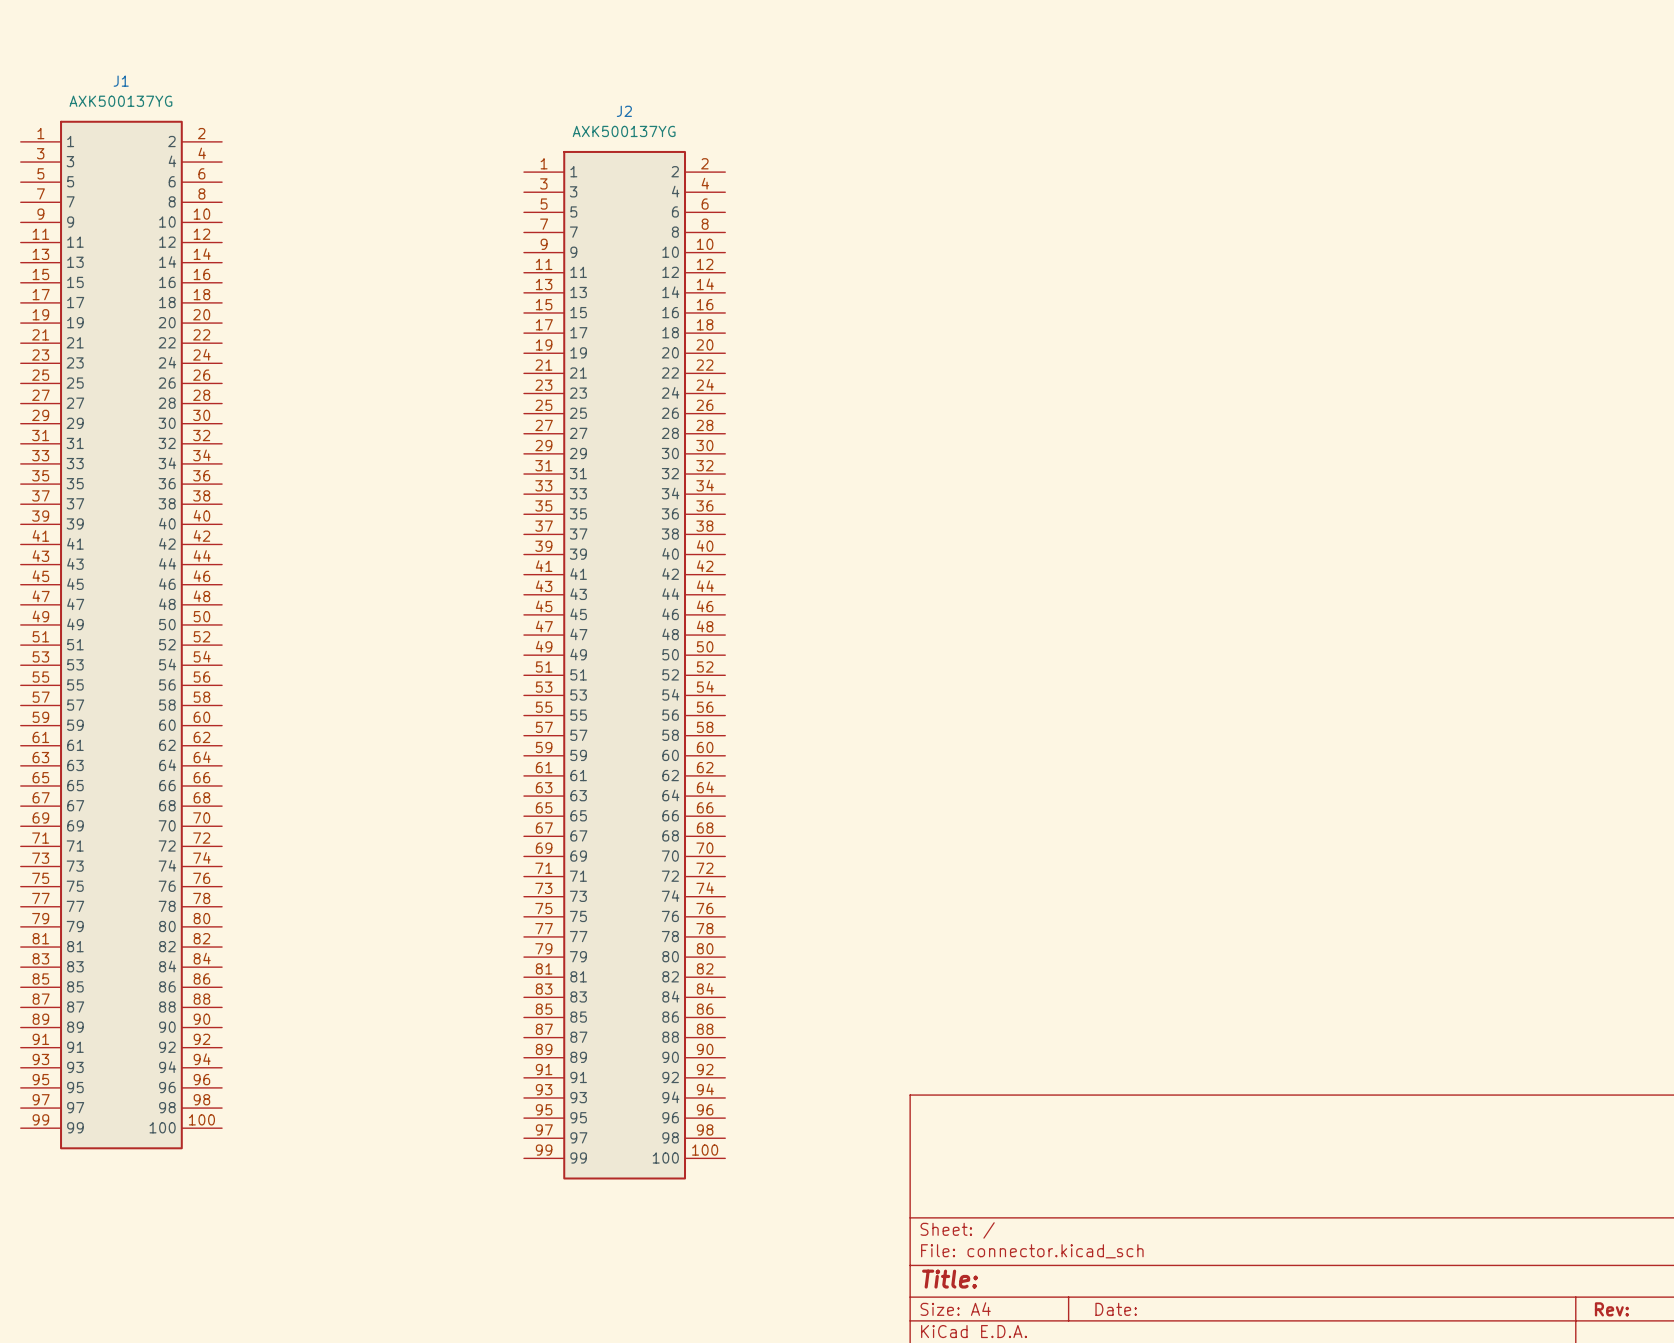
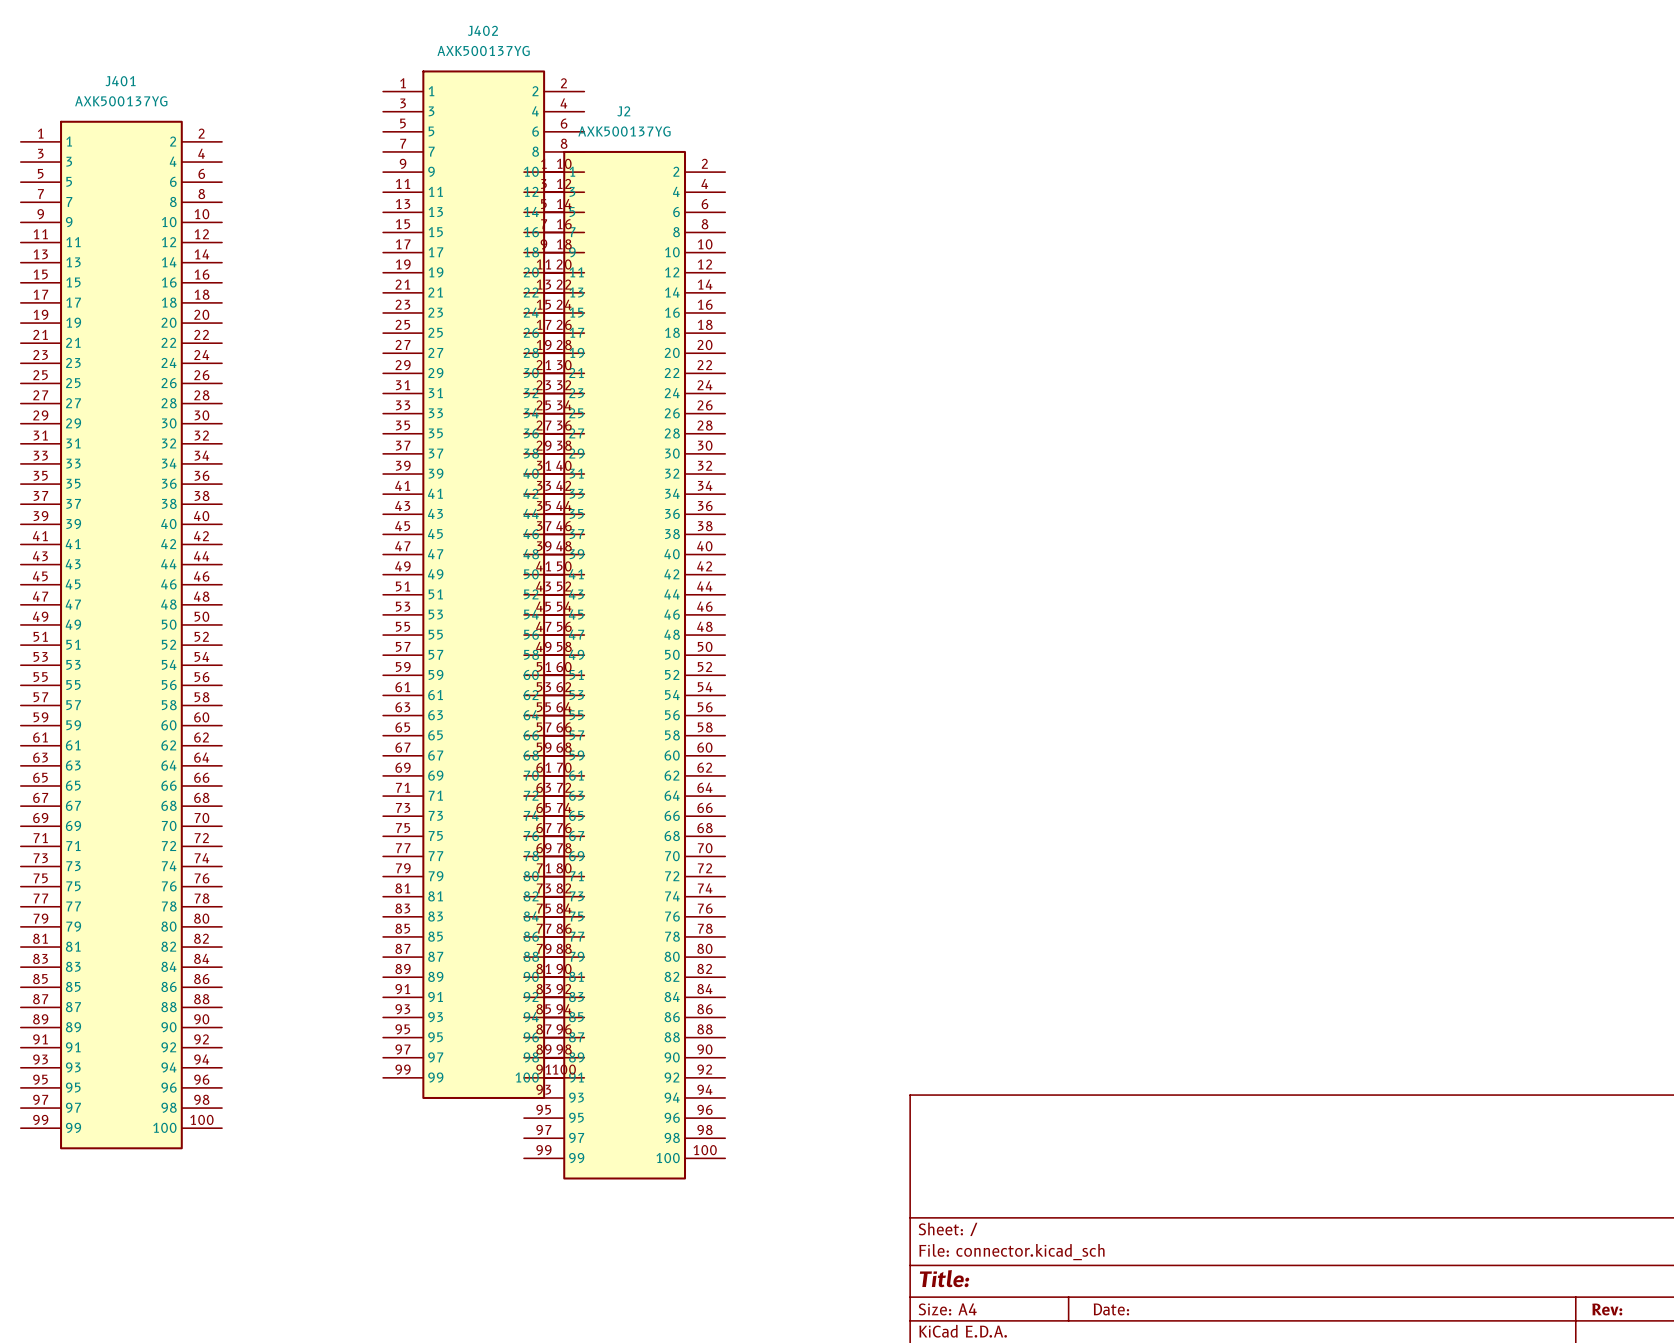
J1 name: J1 (121, 81) -> J401 (120, 81)
J402: none -> AXK500137YG (483, 584)

